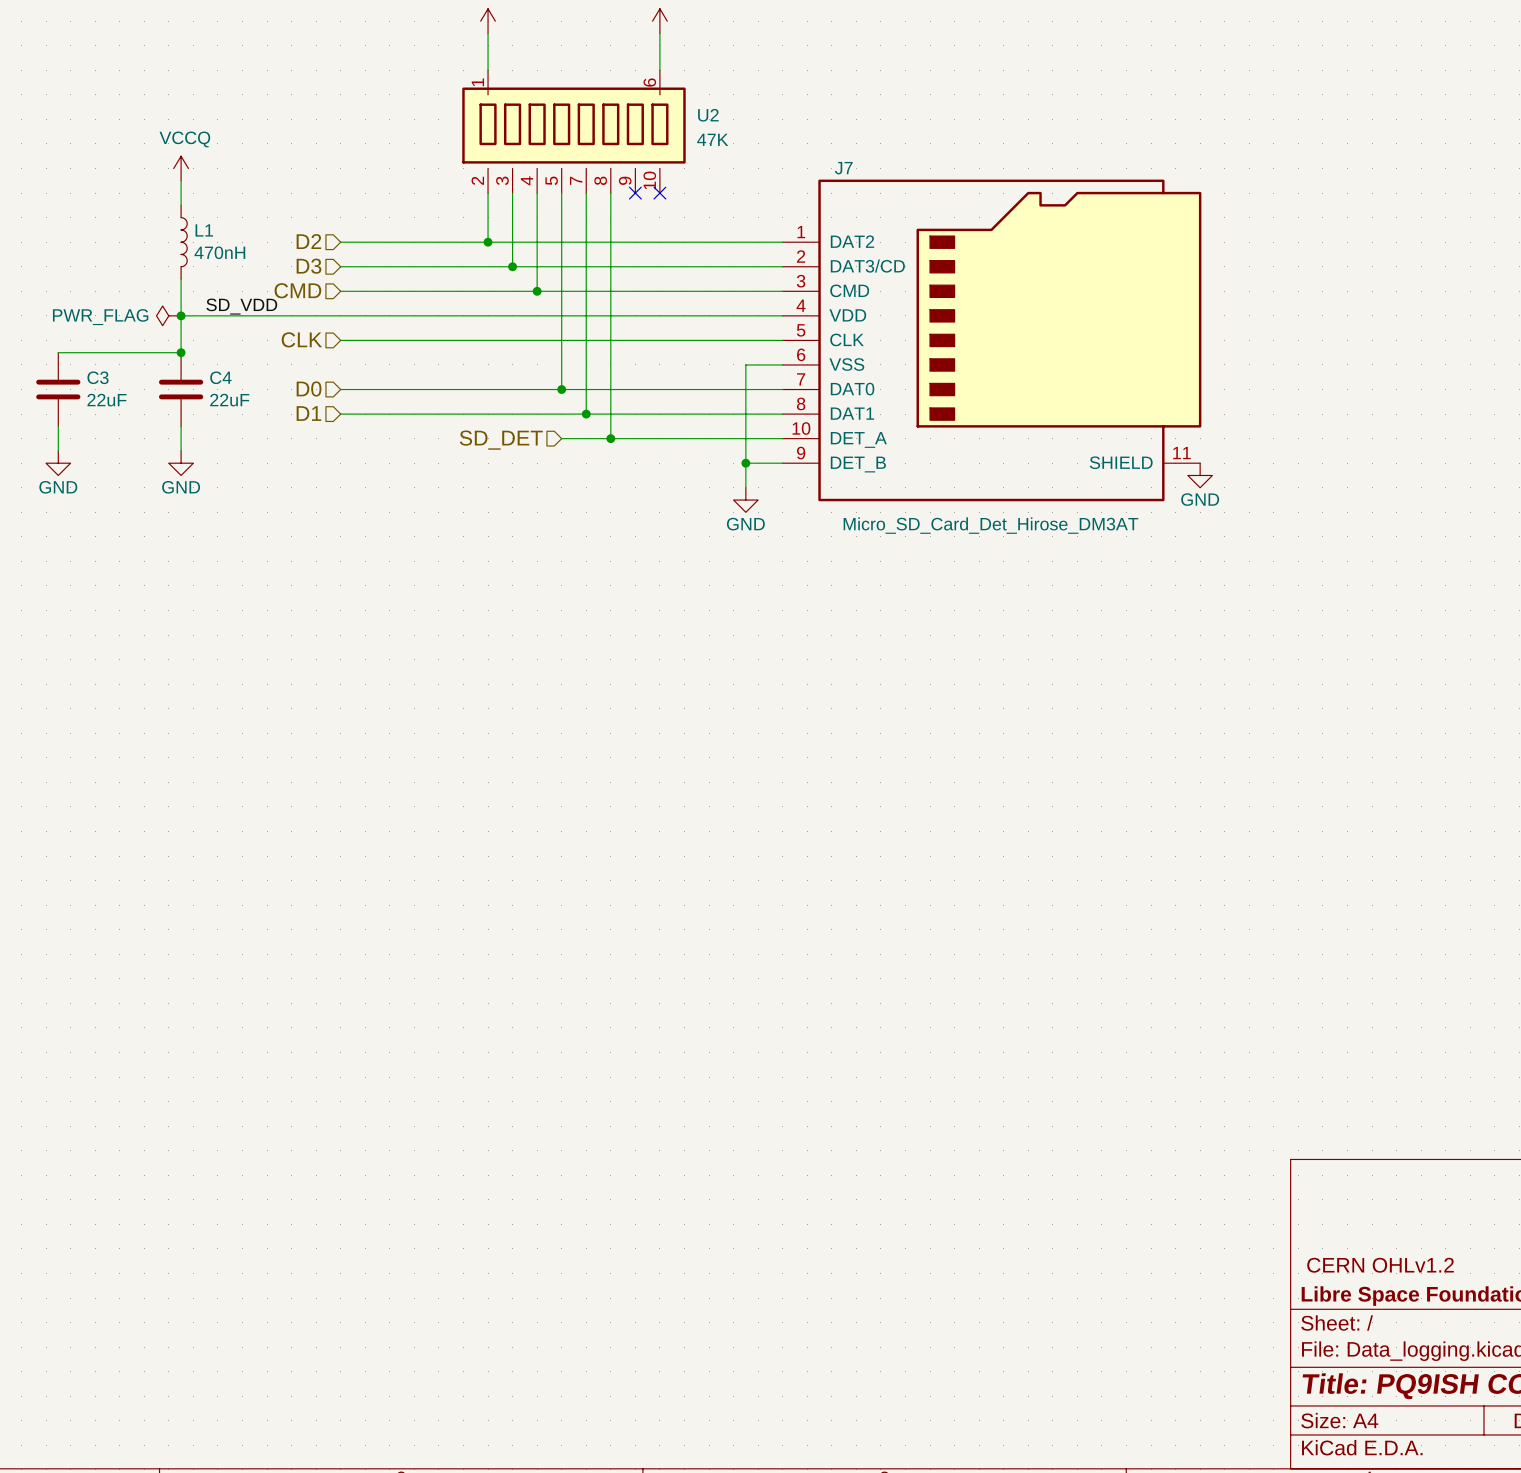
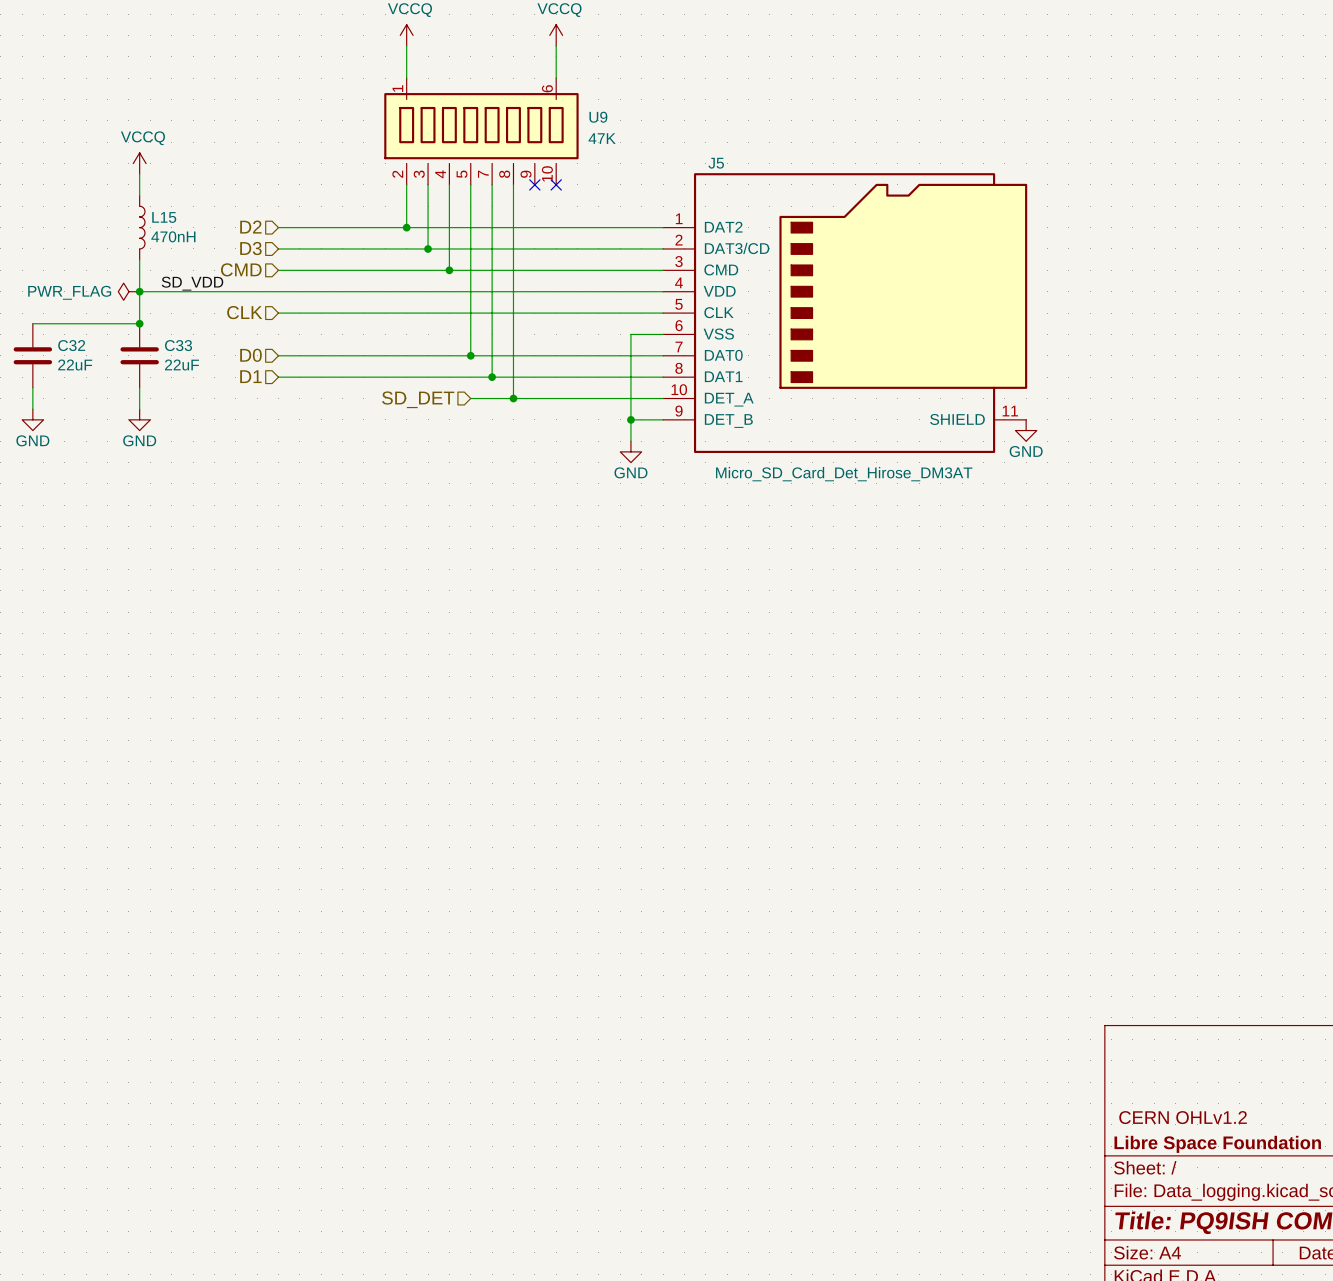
U2 name: U2 (708, 115) -> U9 (598, 117)
J7 name: J7 (843, 168) -> J5 (716, 163)
L1 name: L1 (204, 230) -> L15 (164, 217)
C3 name: C3 (98, 377) -> C32 (71, 345)
C4 name: C4 (220, 377) -> C33 (178, 345)

